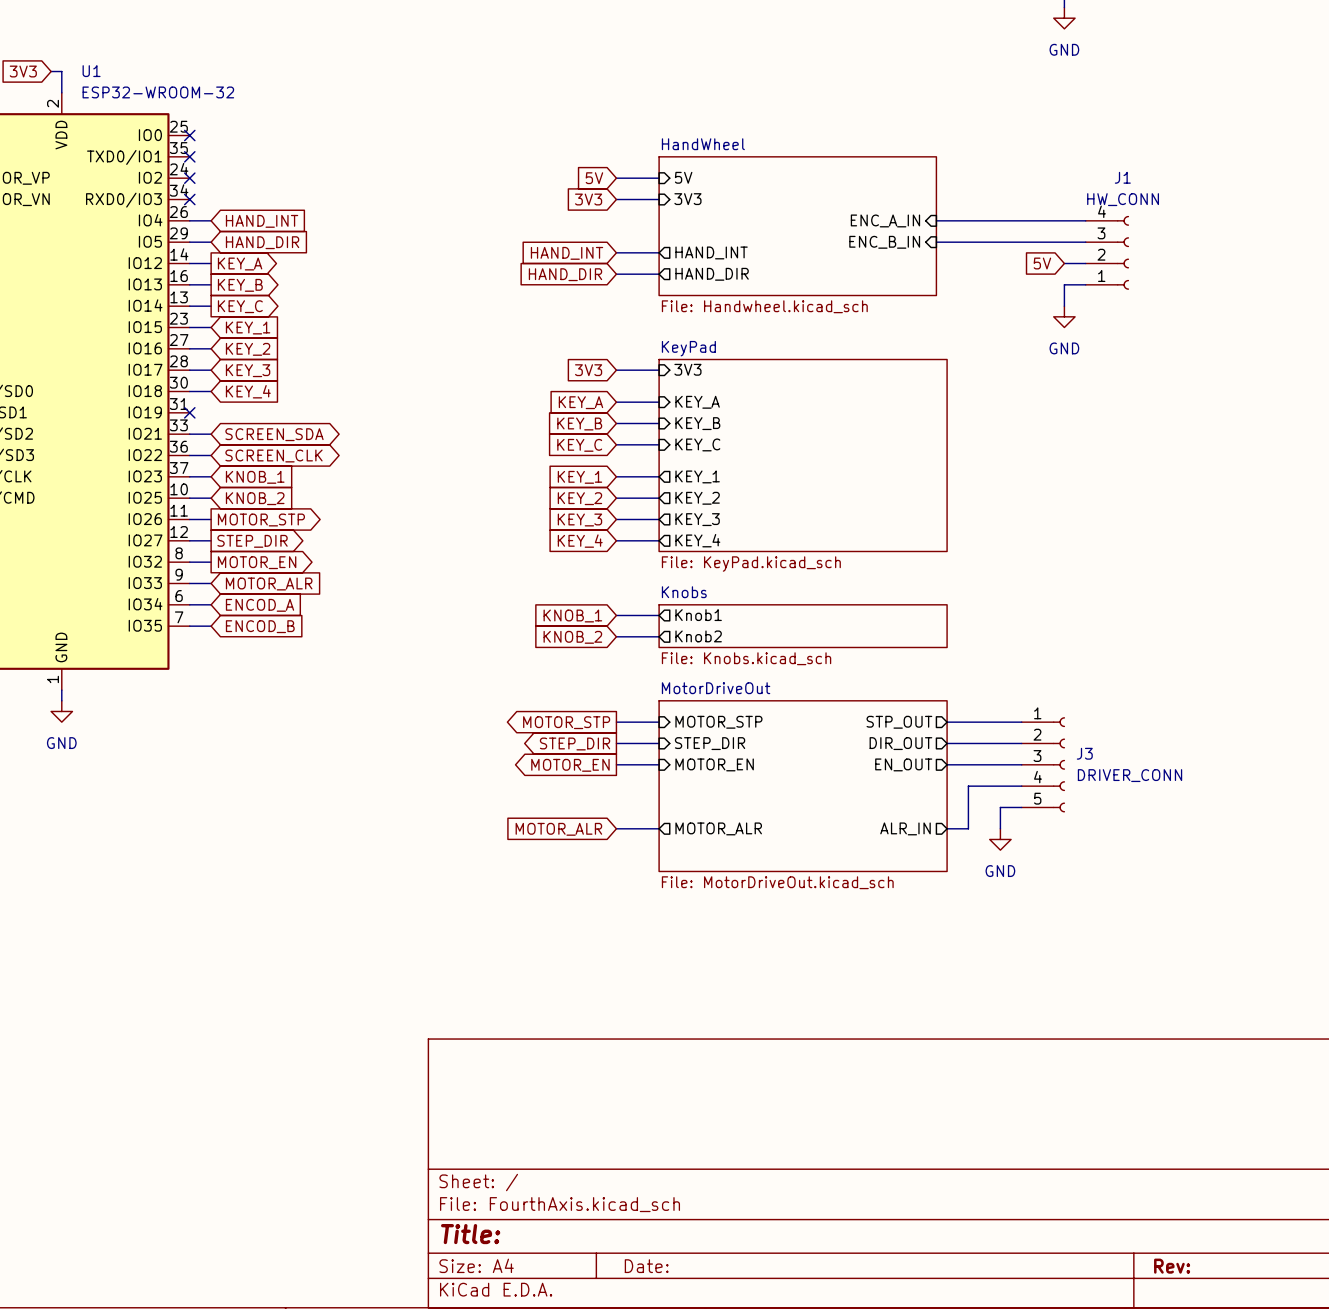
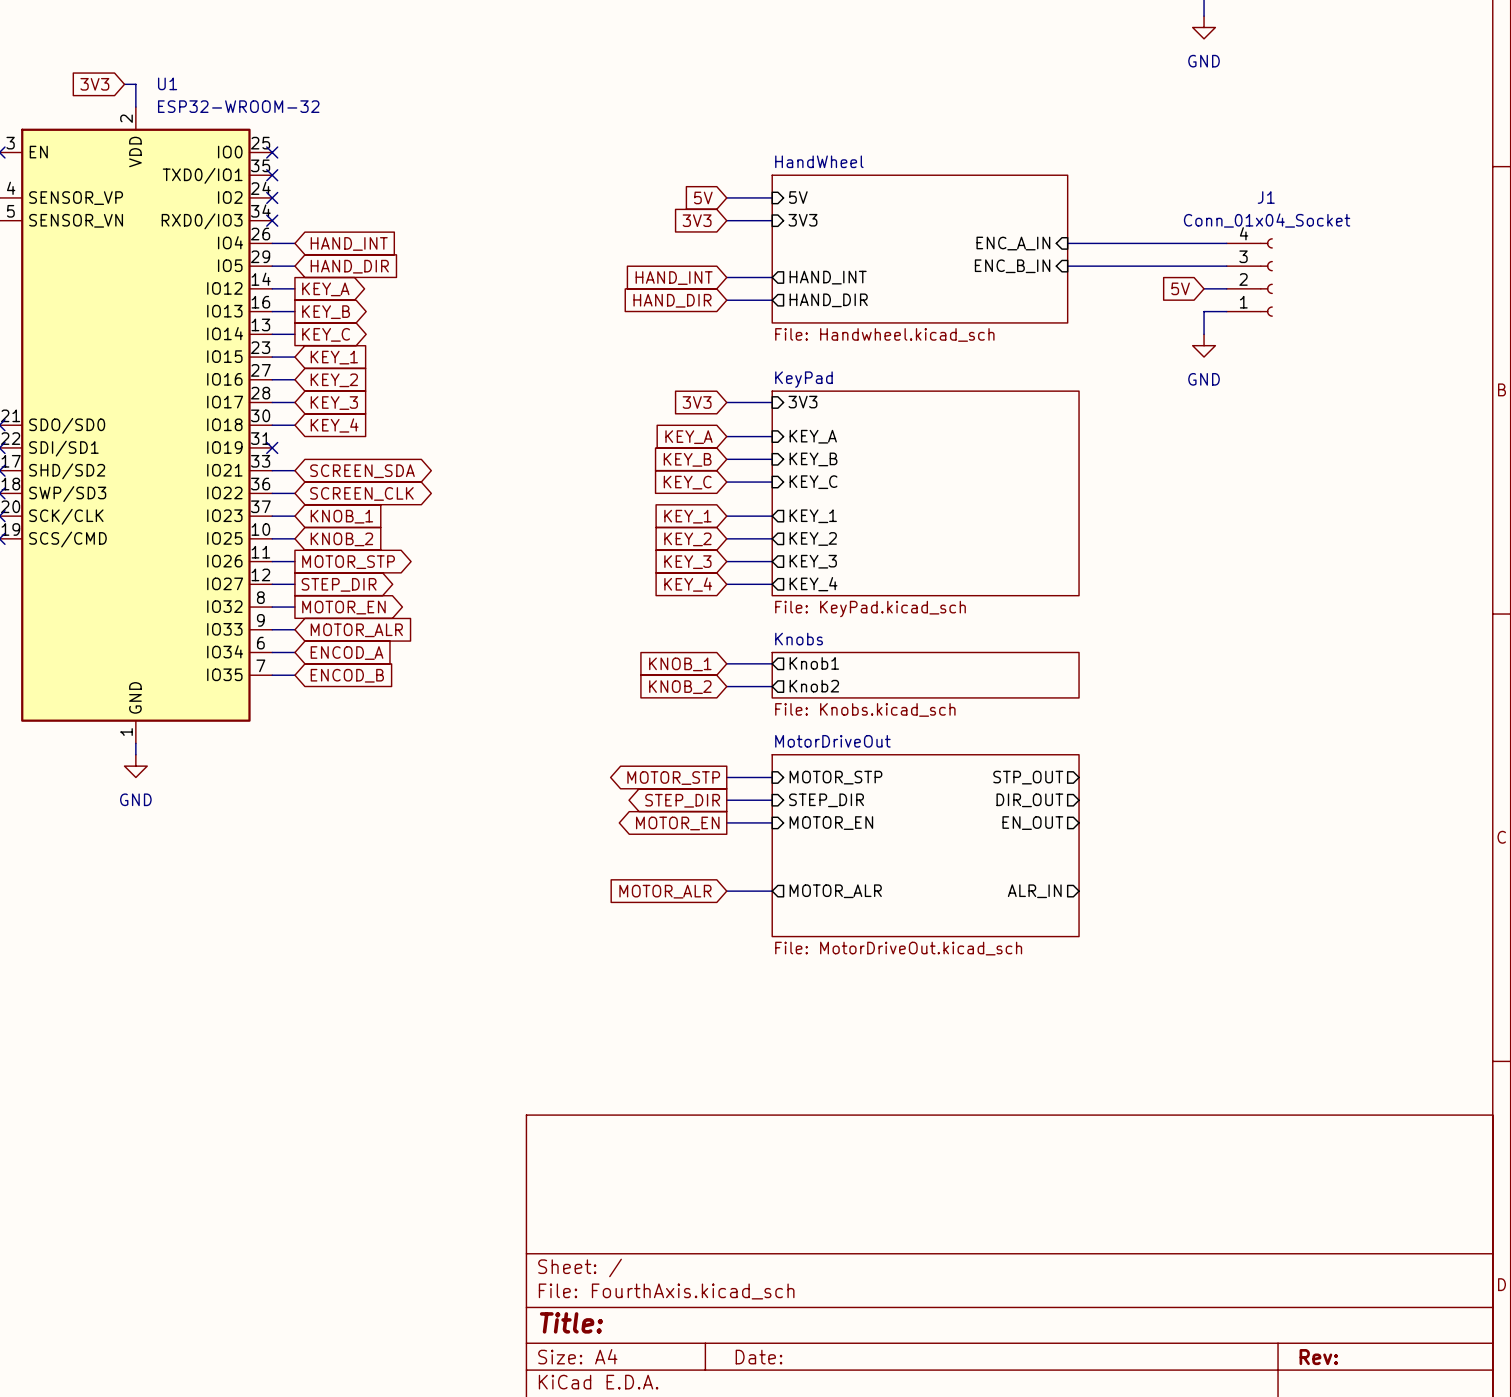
J1 value: HW_CONN (1123, 199) -> Conn_01x04_Socket (1267, 220)
wire: (947, 722) (1021, 722) -> none
wire: (947, 743) (1021, 743) -> none
wire: (947, 764) (1021, 764) -> none
J3: DRIVER_CONN (1043, 764) -> none
wire: (1021, 786) (968, 786) (968, 828) (947, 828) -> none
wire: (1021, 807) (1000, 807) (1000, 828) -> none
power symbol: GND (1000, 839) -> none

